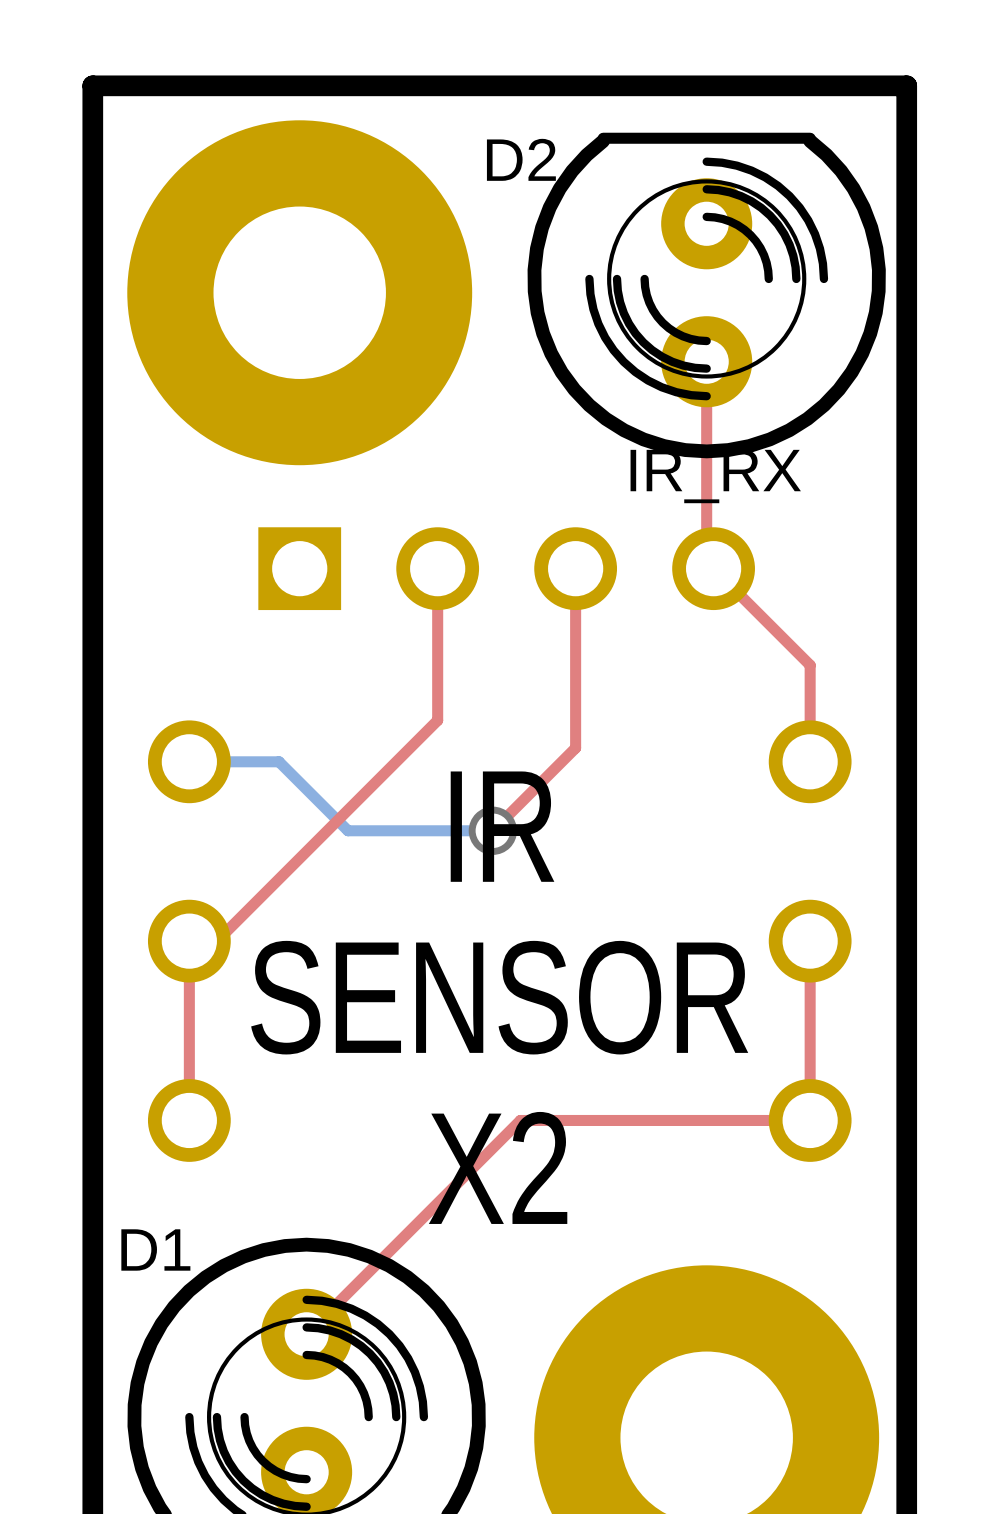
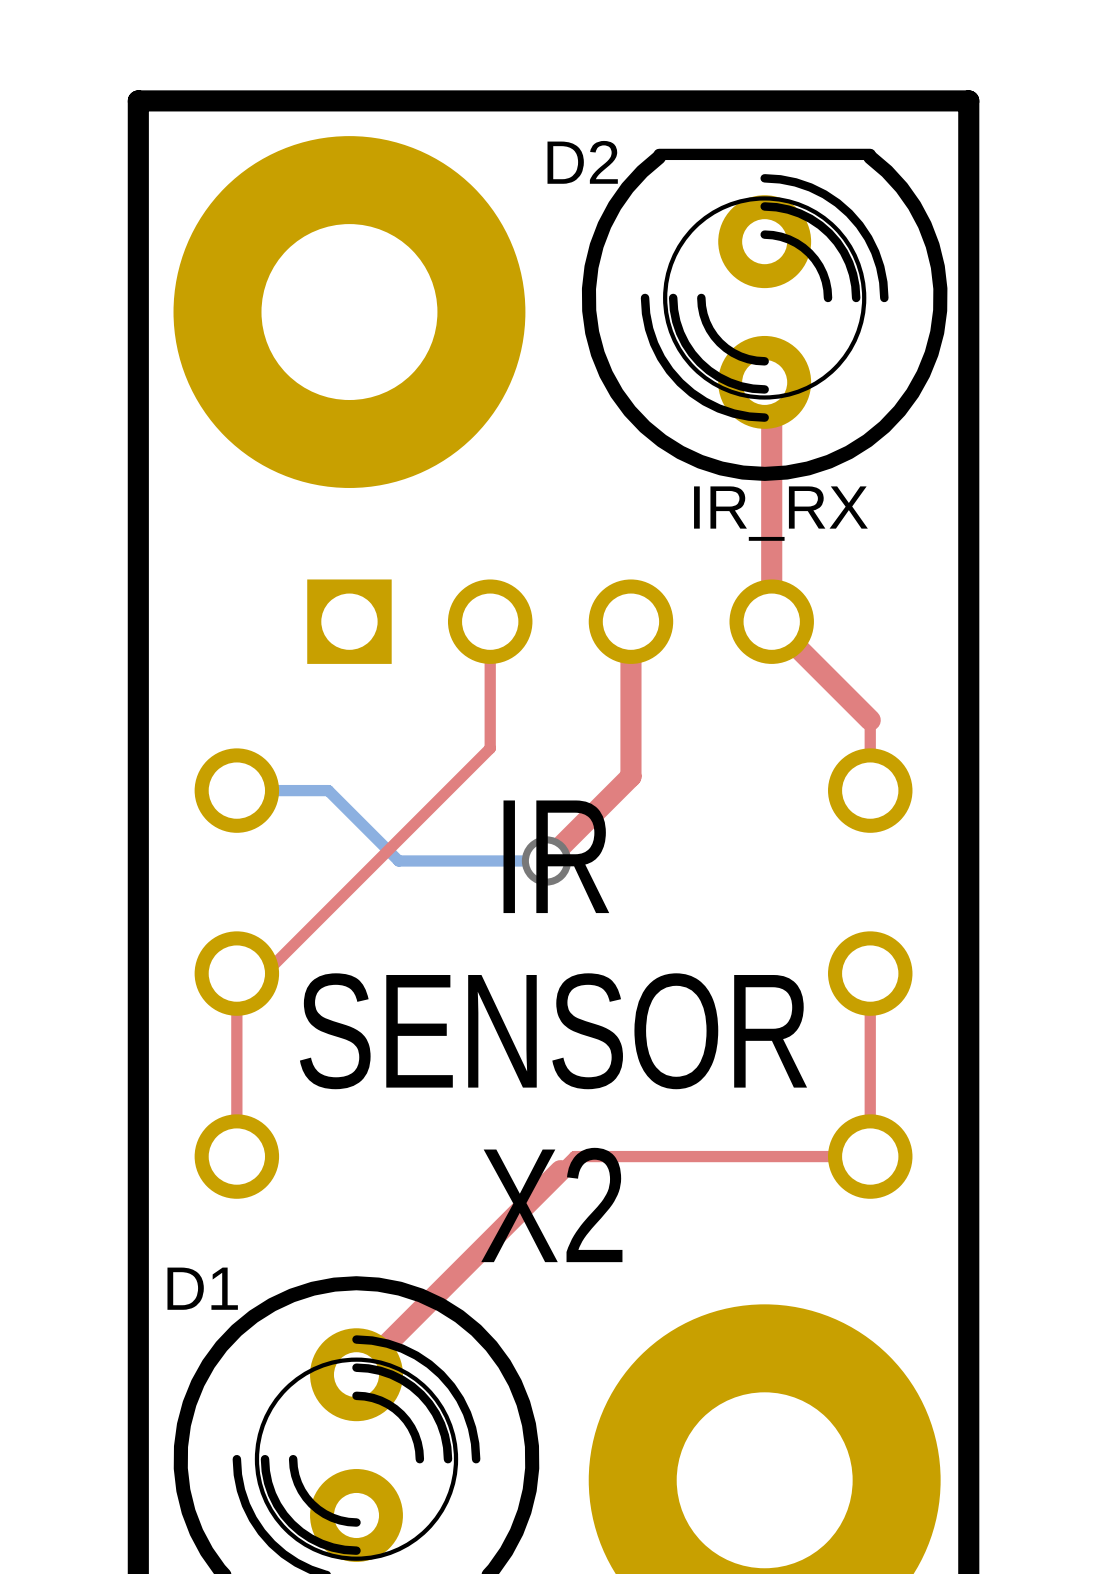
D2 name position: D2 (521, 159) -> D2 (582, 162)
top track: (706, 361) (706, 561) (810, 665) (810, 692) -> (764, 382) (771, 389) (771, 621) (870, 720)
D2 value position: IR_RX (715, 476) -> IR_RX (780, 513)
part position: (506, 568) -> (560, 621)
top track width: thin (575, 596) (575, 748) (492, 830) -> thick (630, 621) (630, 776) (546, 860)
top track width: thin (506, 1134) (306, 1334) -> thick (560, 1170) (356, 1374)

